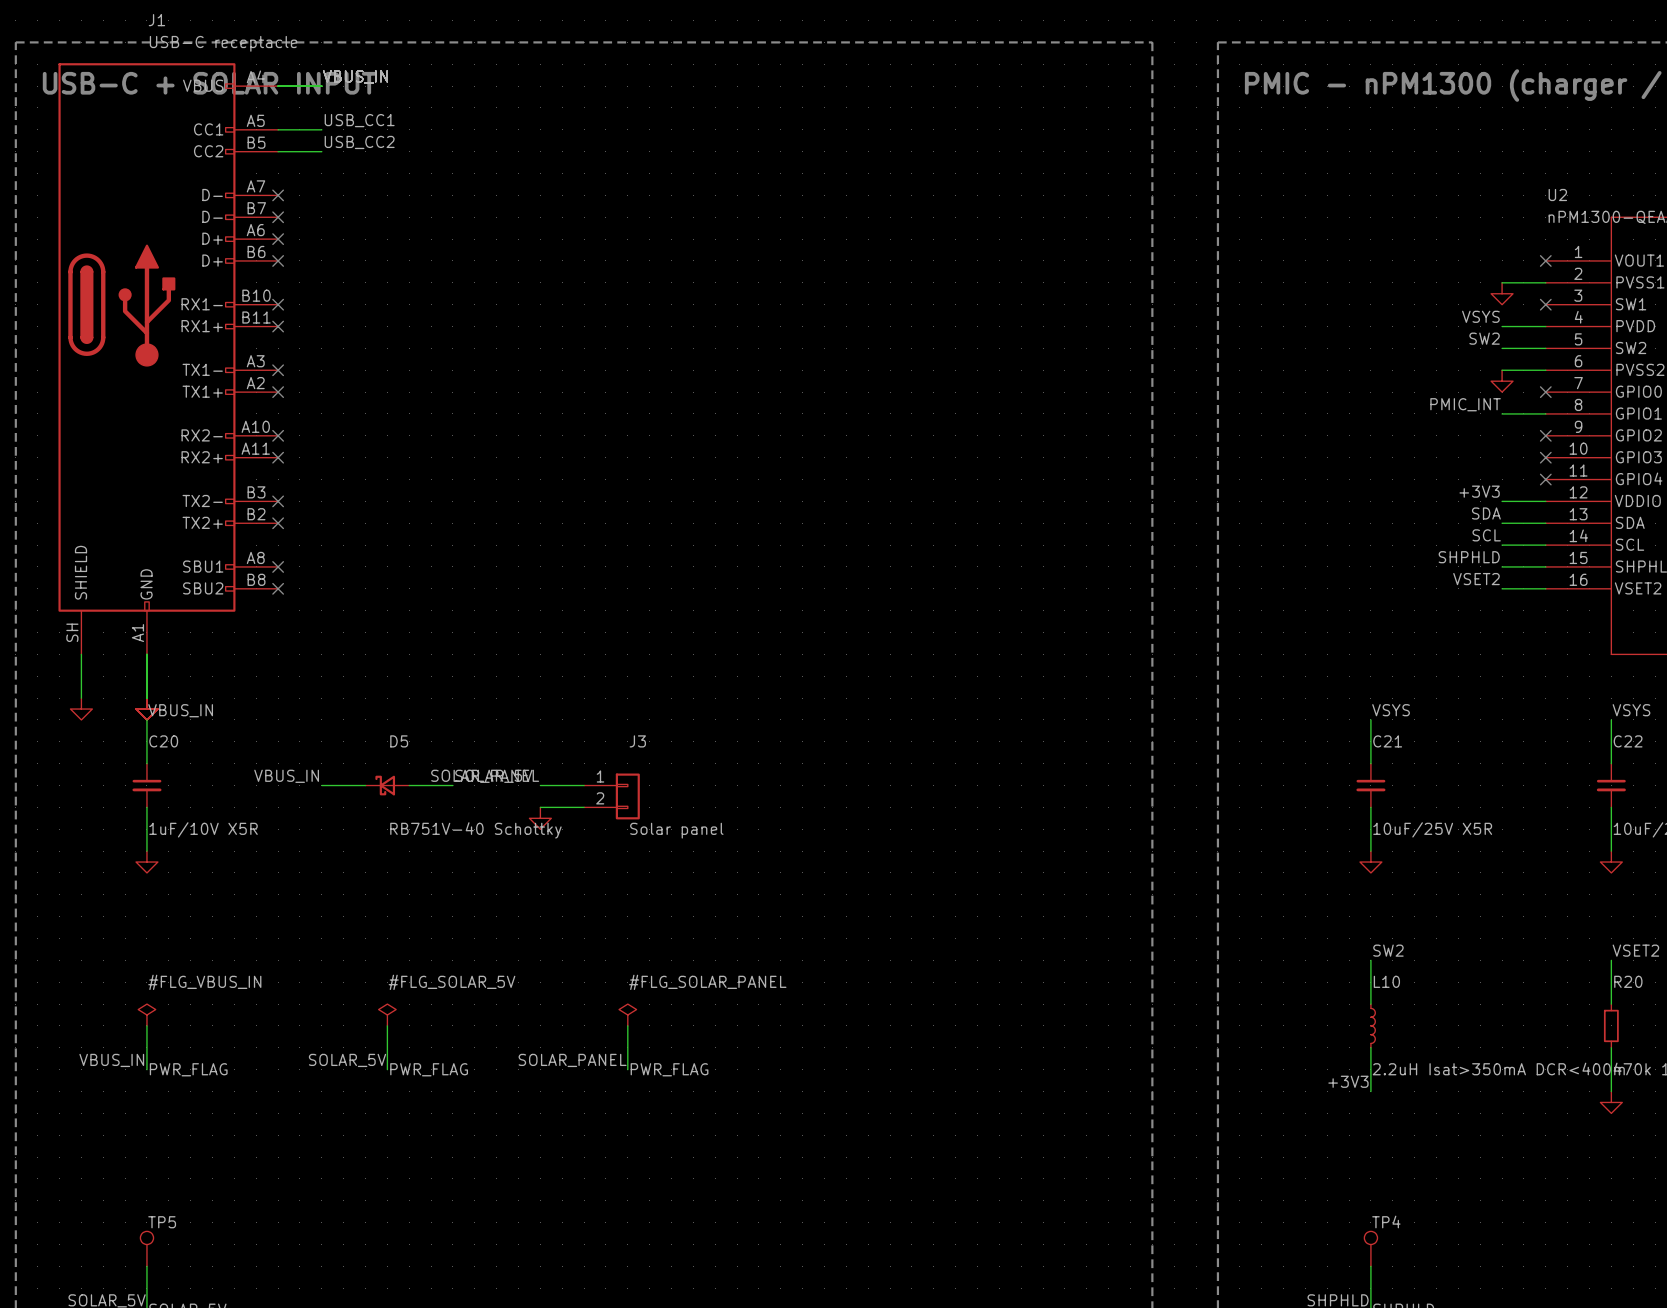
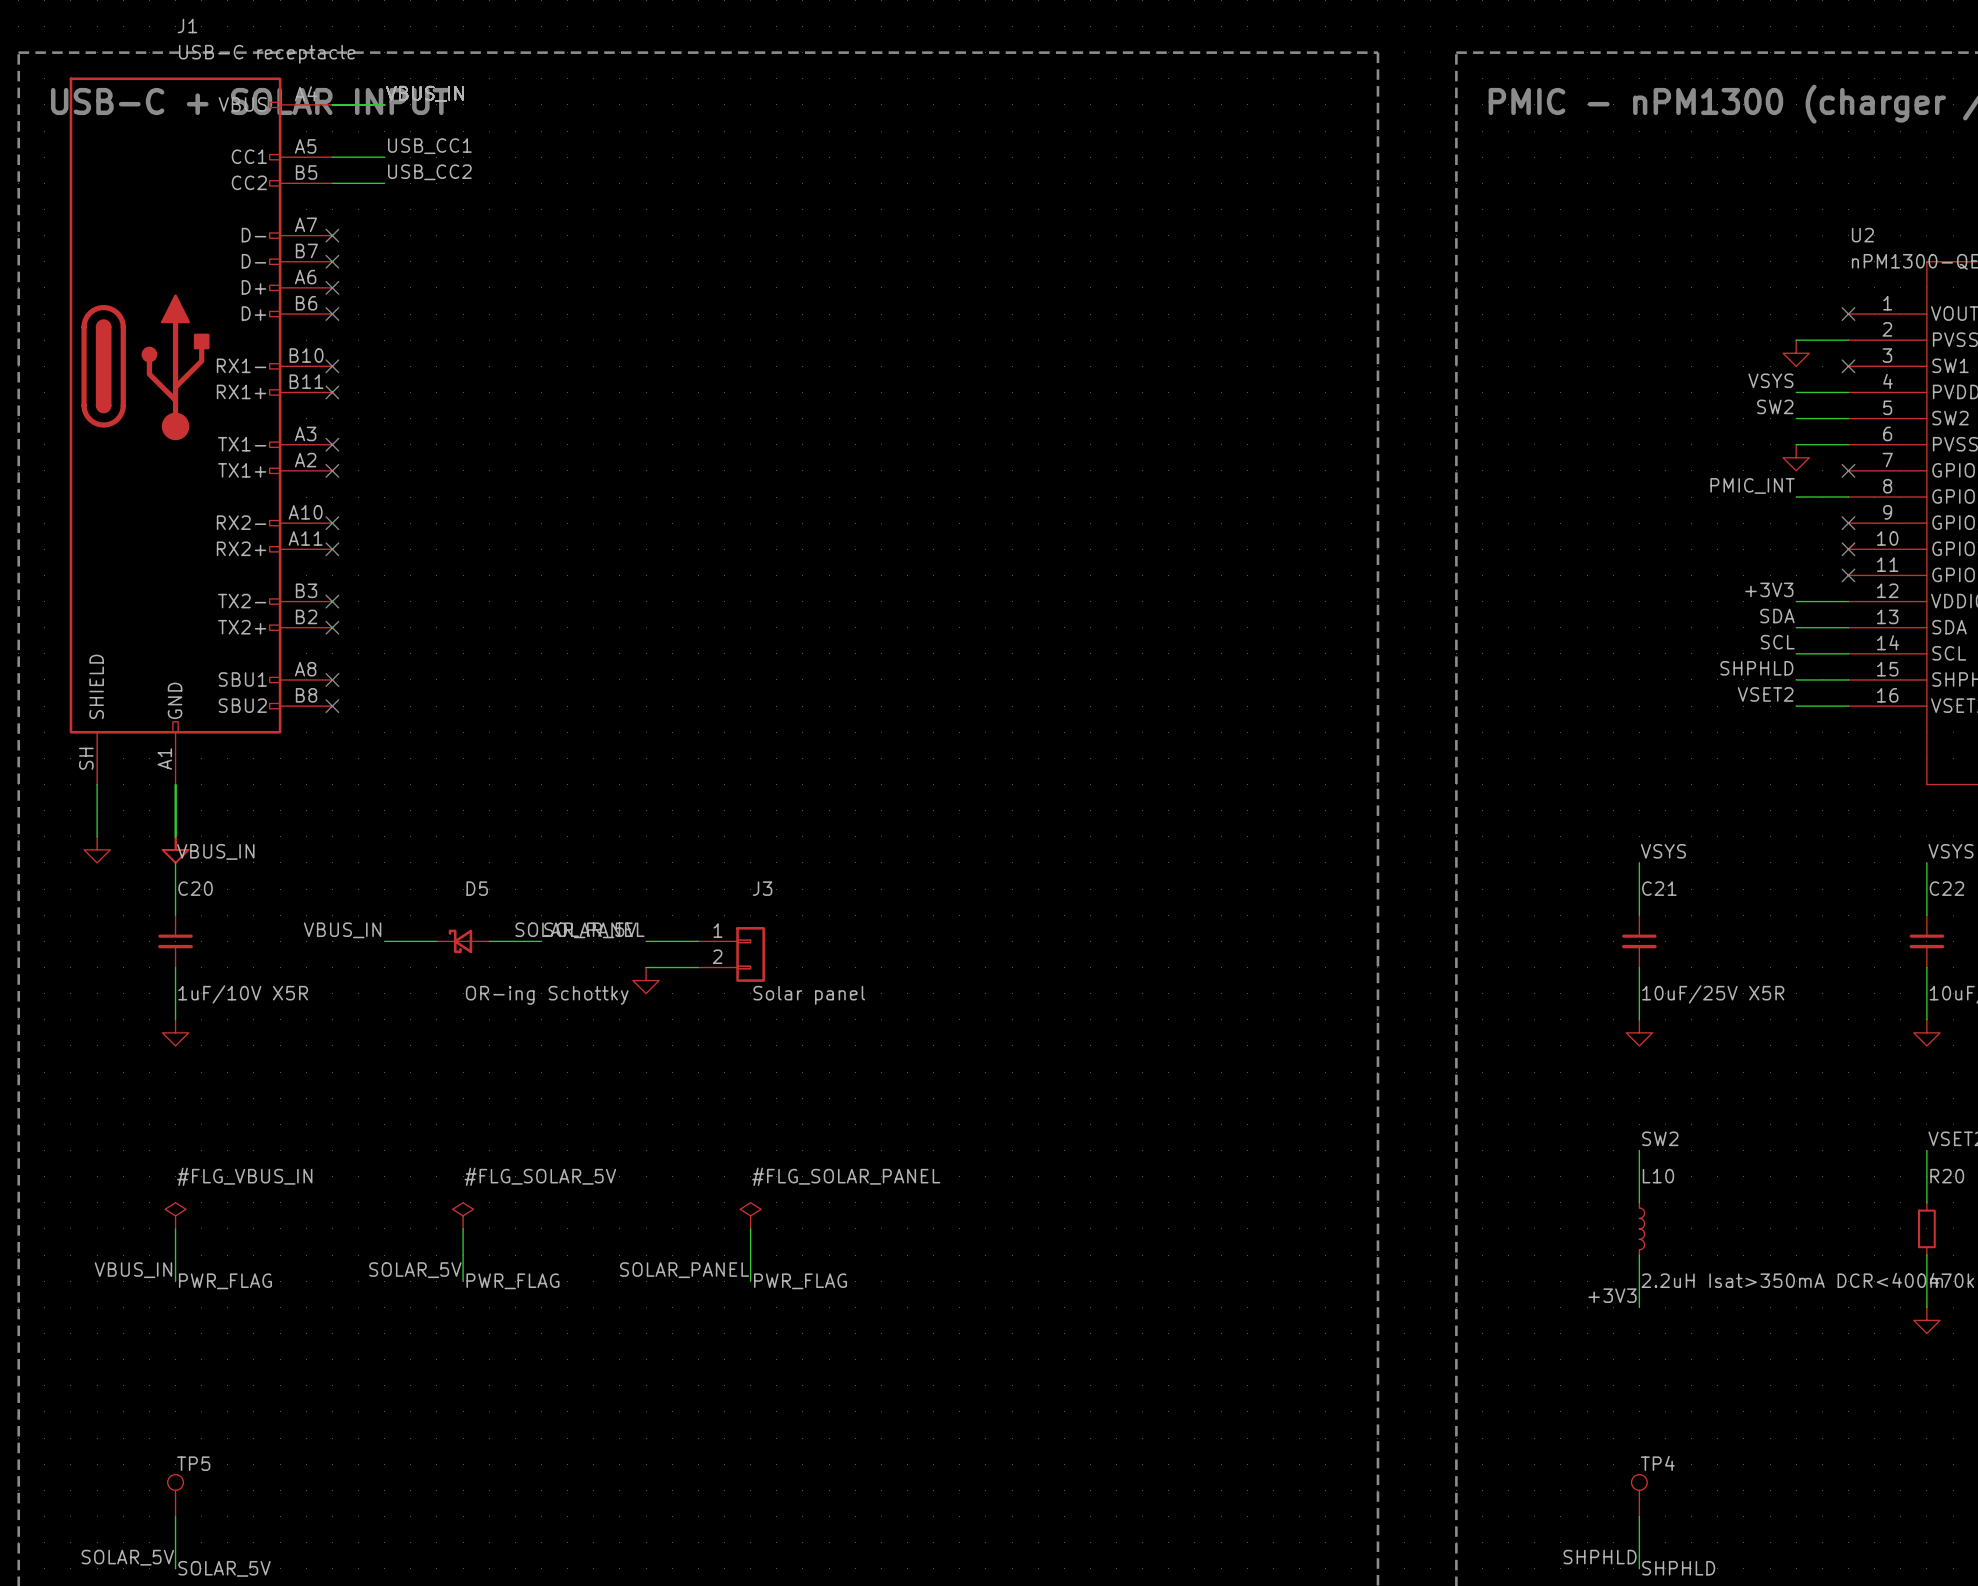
D5 value: RB751V-40 Schottky (475, 830) -> OR-ing Schottky (547, 995)

